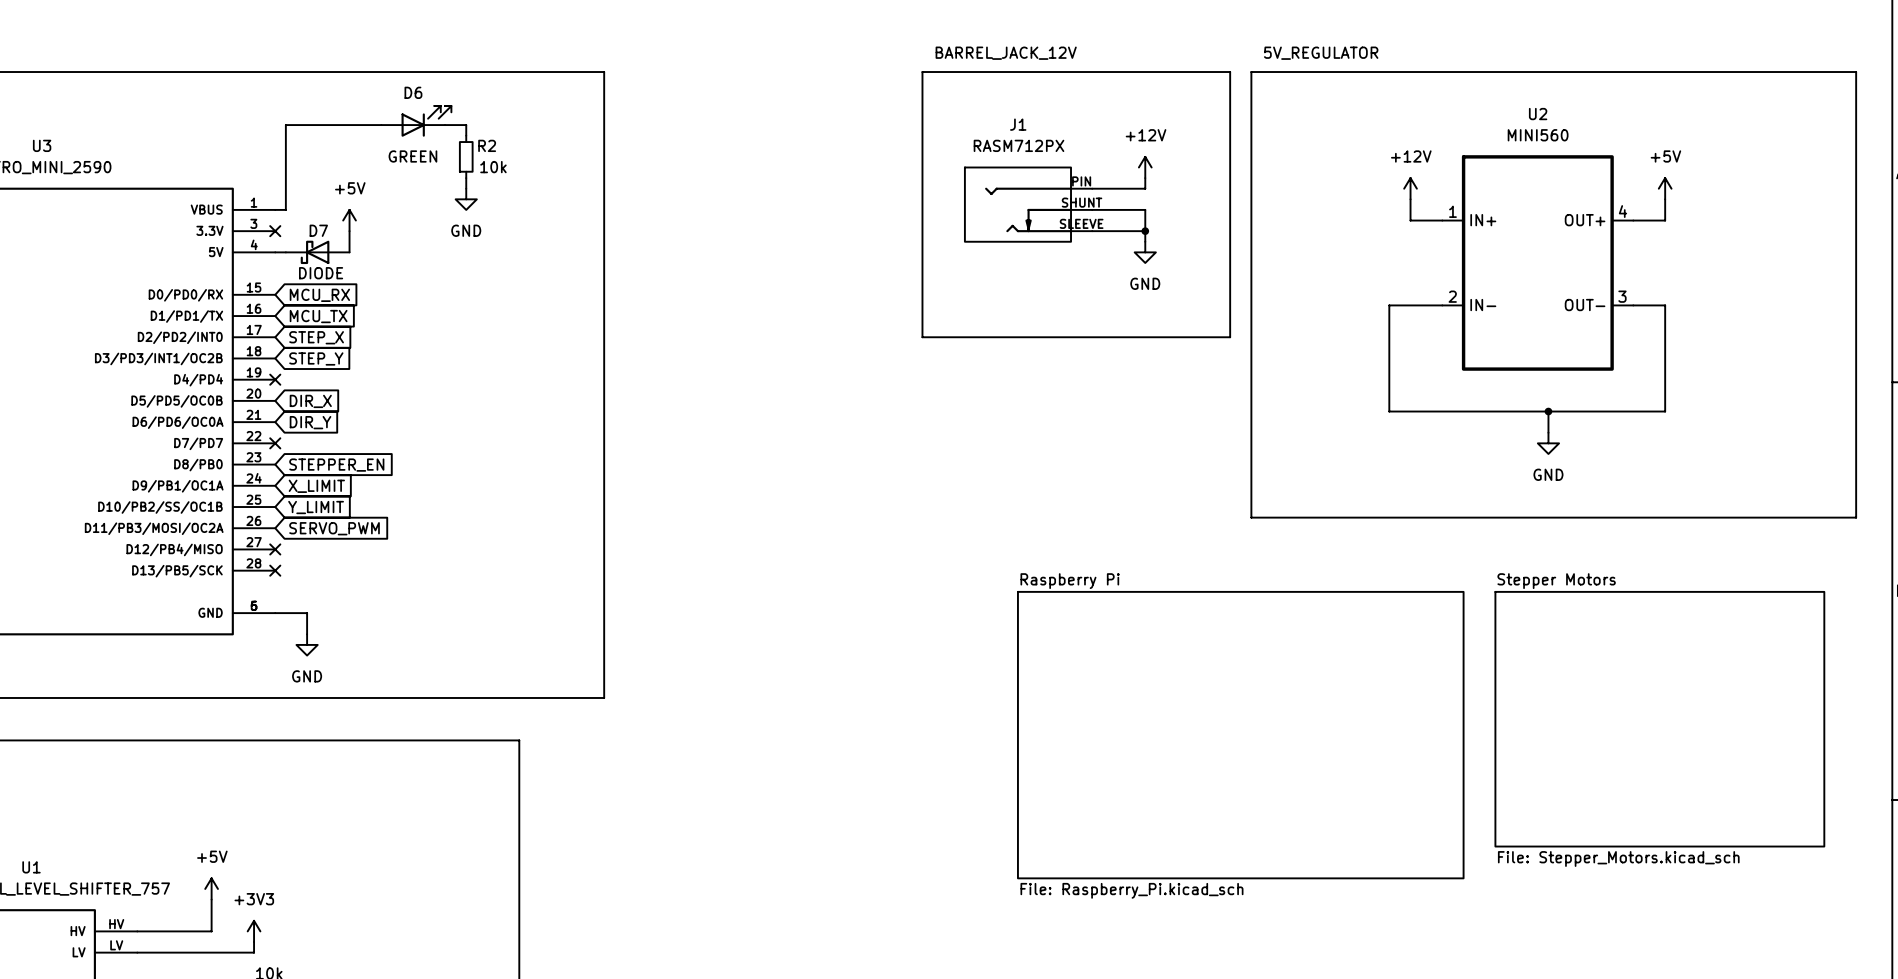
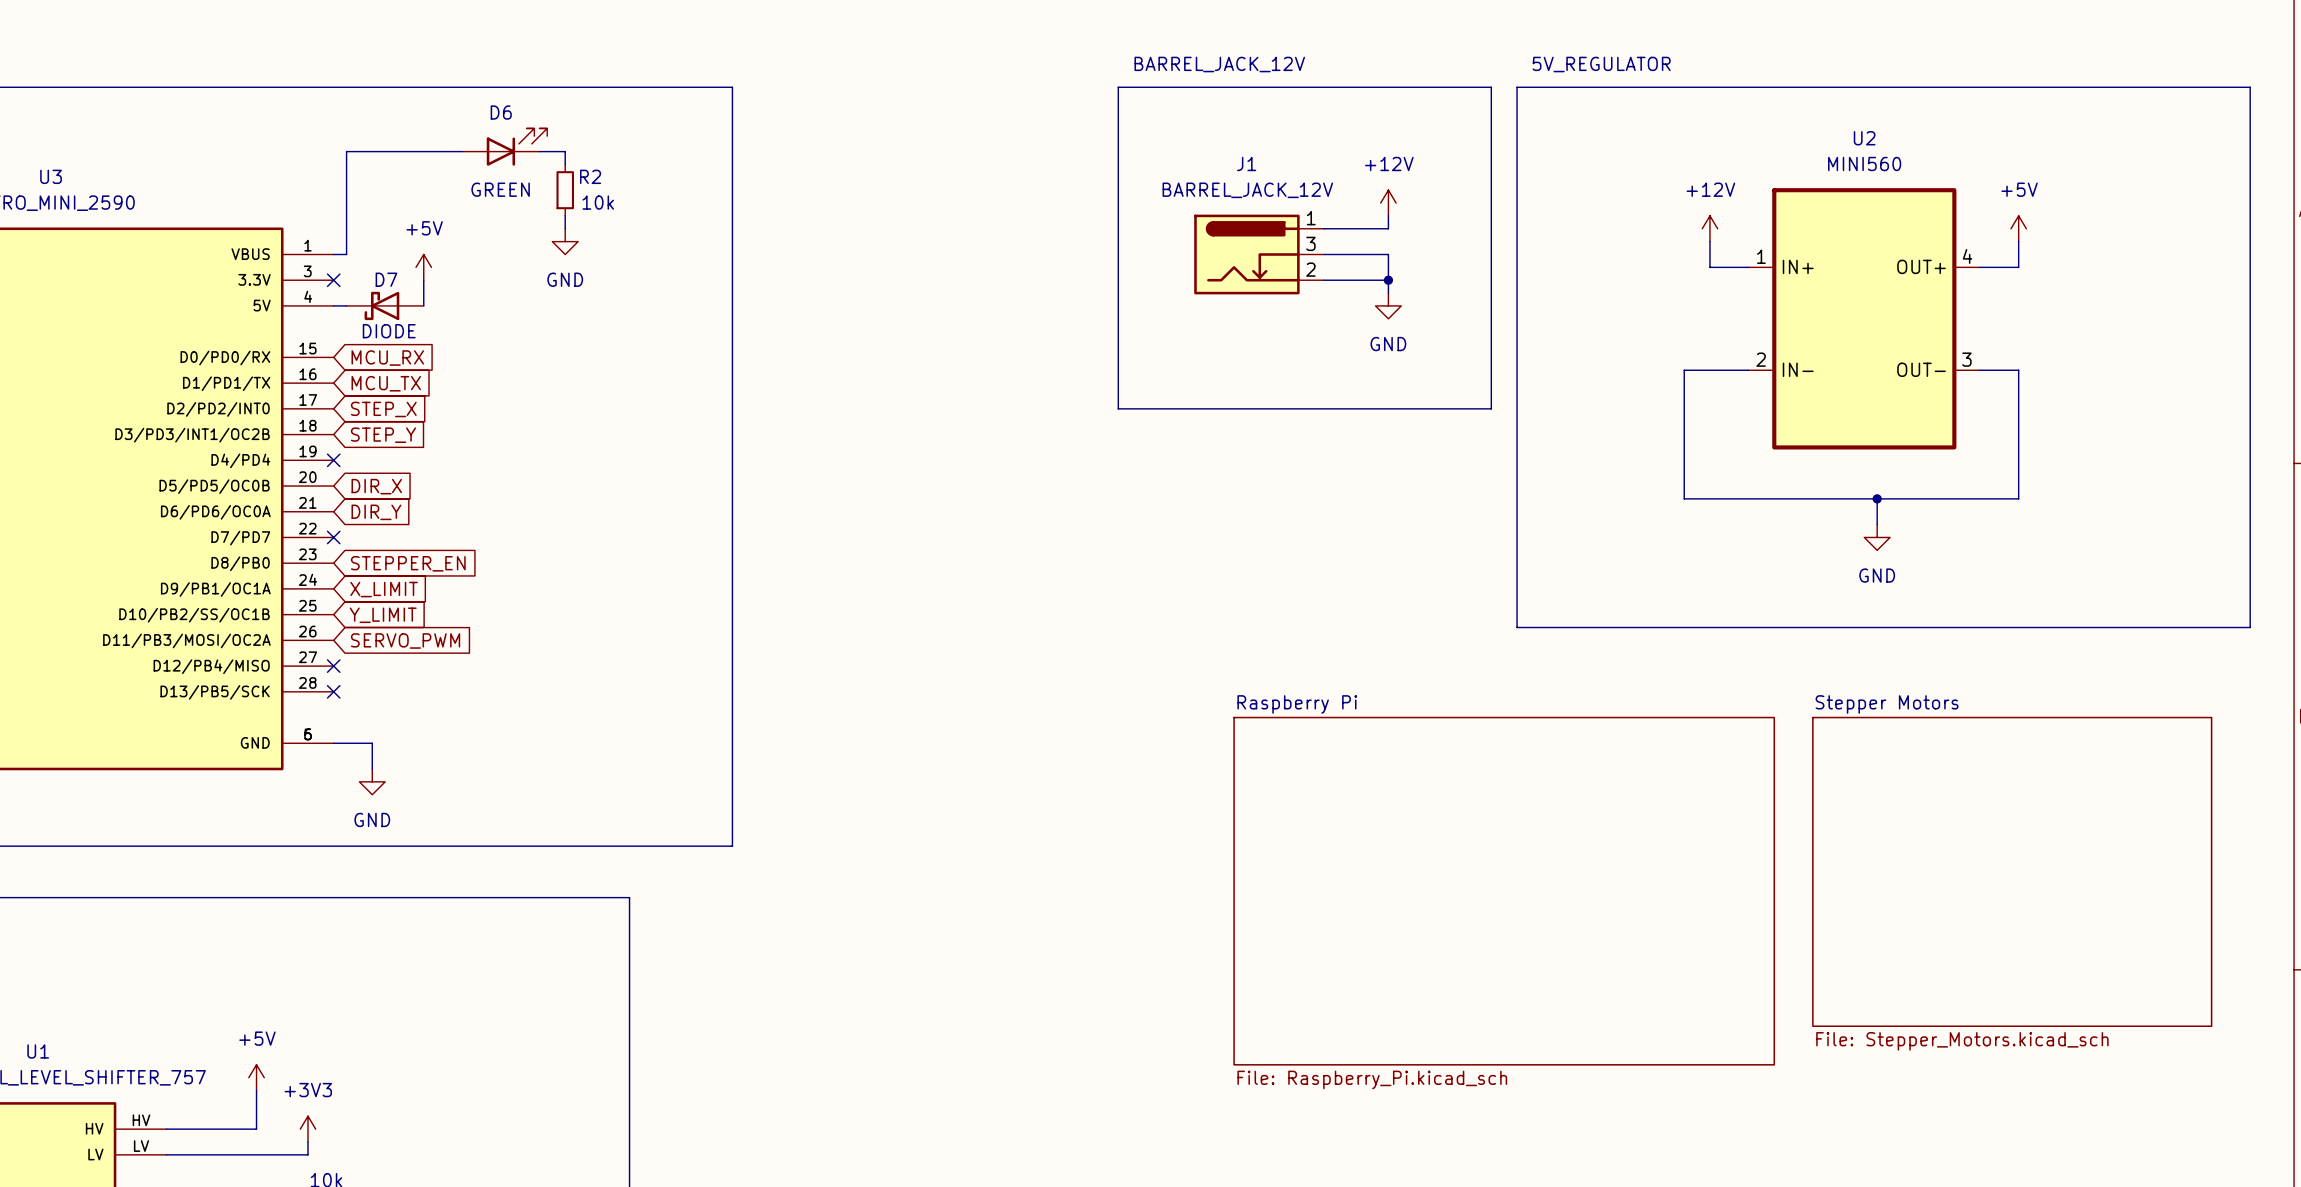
J1 value: RASM712PX (1019, 145) -> BARREL_JACK_12V (1247, 190)
J1 symbol: [964, 167, 1093, 242] -> [1194, 214, 1325, 295]

